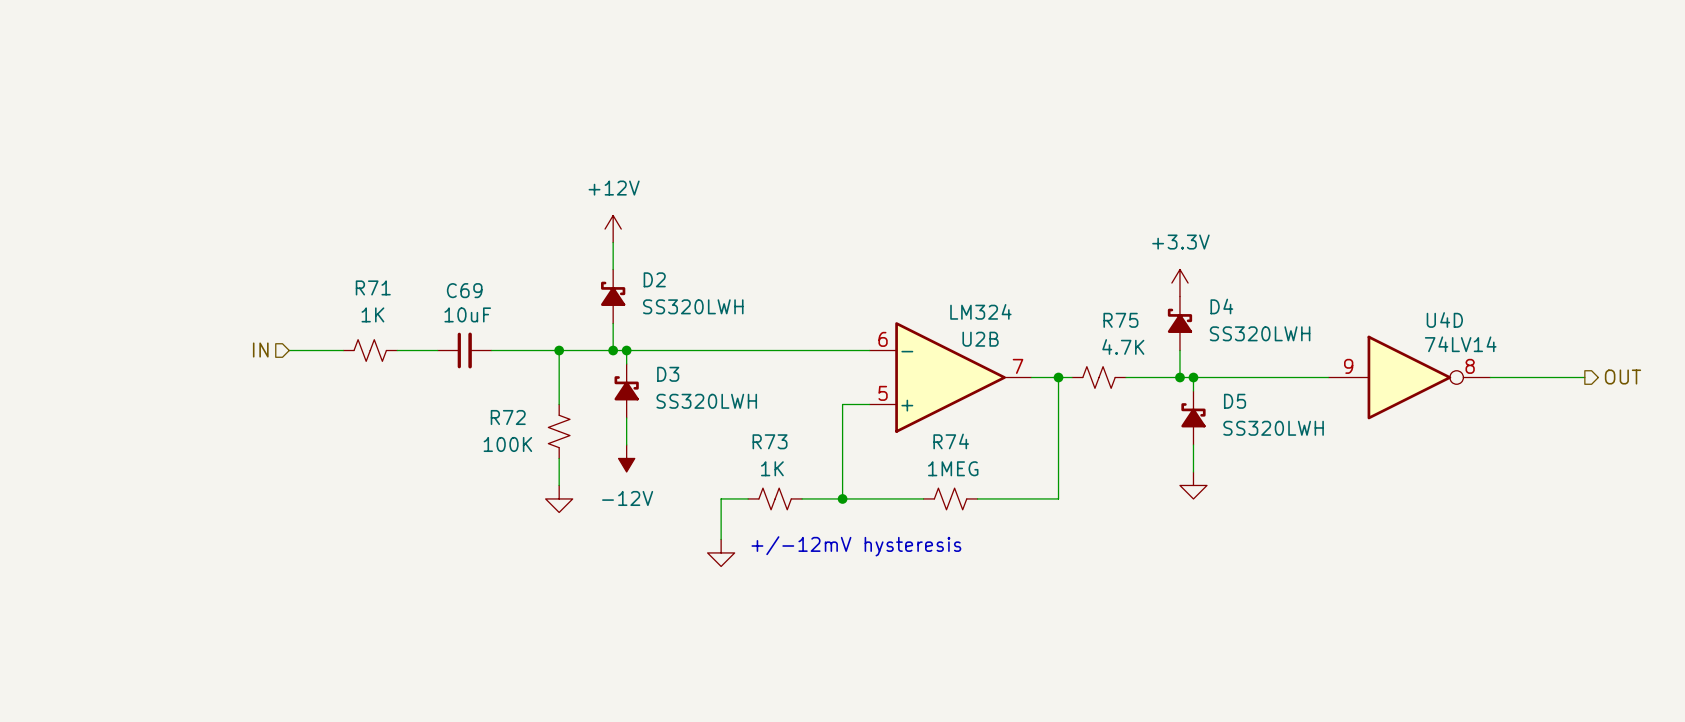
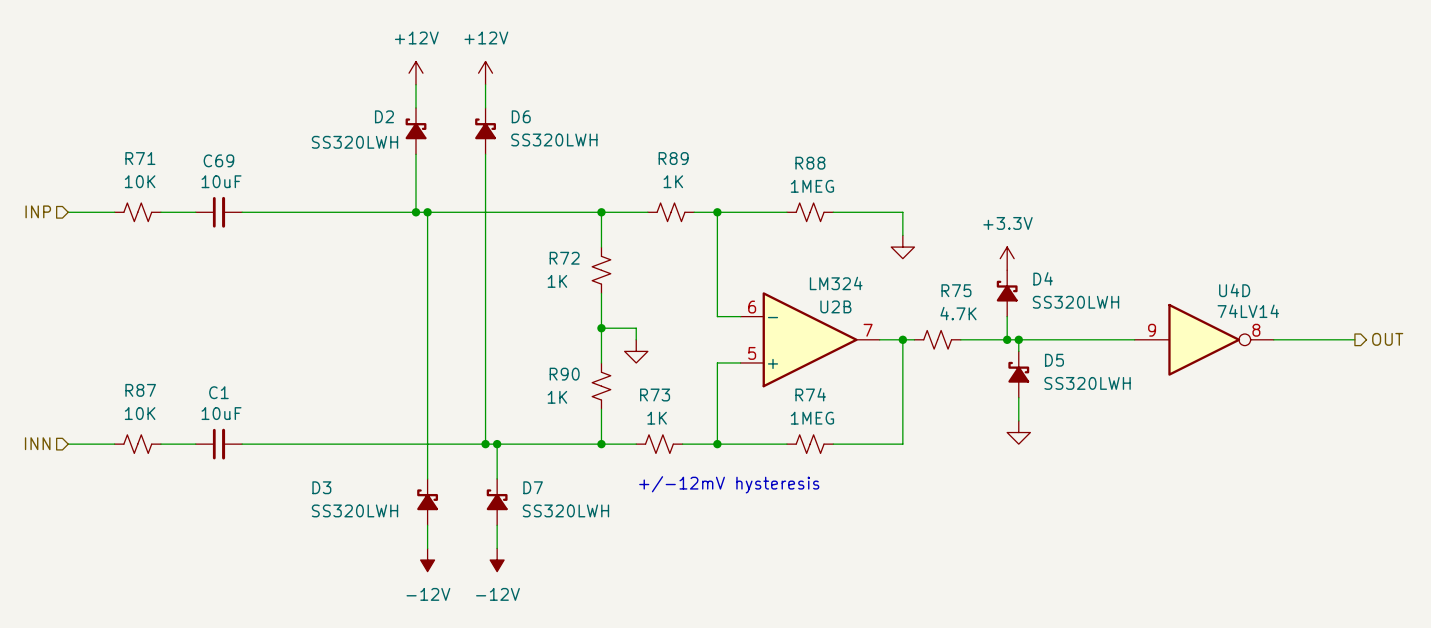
power symbol: none -> +12V (416, 73)
power symbol: none -> +12V (485, 73)
wire: none -> (416, 84) (416, 107)
D6: none -> SS320LWH (485, 131)
wire: none -> (416, 154) (416, 212)
wire: none -> (485, 154) (485, 444)
hierarchical label: none -> INP (38, 211)
wire: none -> (242, 212) (647, 212)
junction: none -> (416, 212)
wire: none -> (427, 212) (427, 478)
junction: none -> (427, 212)
power symbol: +12V (613, 229) -> none
wire: none -> (601, 212) (601, 247)
junction: none -> (601, 212)
R89: none -> 1K (671, 212)
wire: none -> (694, 212) (786, 212)
junction: none -> (717, 212)
R88: none -> 1MEG (810, 212)
wire: none -> (833, 212) (902, 212) (902, 235)
wire: (613, 242) (613, 269) -> (485, 84) (485, 107)
power symbol: none -> (902, 247)
D2 name position: D2 (654, 279) -> D2 (384, 116)
D2 position: (613, 296) -> (416, 131)
D2 value position: SS320LWH (693, 306) -> SS320LWH (354, 142)
R71 value: 1K (372, 314) -> 10K (140, 181)
wire: (613, 323) (613, 350) -> none
wire: none -> (601, 293) (601, 362)
hierarchical label: IN (260, 350) -> none
wire: (289, 350) (343, 350) -> (68, 212) (114, 212)
R71 position: (370, 350) -> (137, 212)
wire: (397, 350) (437, 350) -> (160, 212) (195, 212)
C69 position: (464, 350) -> (218, 212)
wire: (491, 350) (842, 350) -> (717, 212) (717, 316)
wire: (559, 350) (559, 404) -> none
junction: (559, 350) -> none
junction: (613, 350) -> none
wire: (626, 350) (626, 364) -> none
junction: (626, 350) -> none
wire: none -> (601, 328) (636, 328) (636, 339)
junction: none -> (601, 328)
D3 name position: D3 (668, 374) -> D3 (321, 487)
D3 position: (626, 391) -> (427, 502)
power symbol: none -> (636, 351)
D3 value position: SS320LWH (706, 401) -> SS320LWH (354, 510)
R72 name position: R72 (508, 417) -> R72 (564, 258)
wire: (626, 417) (626, 444) -> (427, 525) (427, 548)
R72 position: (559, 431) -> (601, 270)
R90: none -> 1K (601, 386)
R72 value: 100K (507, 444) -> 1K (557, 281)
wire: (559, 458) (559, 485) -> (497, 525) (497, 548)
power symbol: -12V (626, 458) -> none
wire: none -> (601, 409) (601, 444)
hierarchical label: none -> INN (37, 443)
wire: none -> (68, 444) (114, 444)
R87: none -> 10K (137, 444)
wire: none -> (160, 444) (195, 444)
C1: none -> 10uF (218, 444)
power symbol: (559, 498) -> none
junction: none -> (485, 444)
wire: none -> (497, 444) (497, 478)
junction: none -> (497, 444)
junction: none -> (601, 444)
wire: (721, 498) (721, 539) -> (613, 444) (242, 444)
power symbol: (721, 552) -> none
D7: none -> SS320LWH (497, 502)
power symbol: none -> -12V (427, 560)
power symbol: none -> -12V (497, 560)

